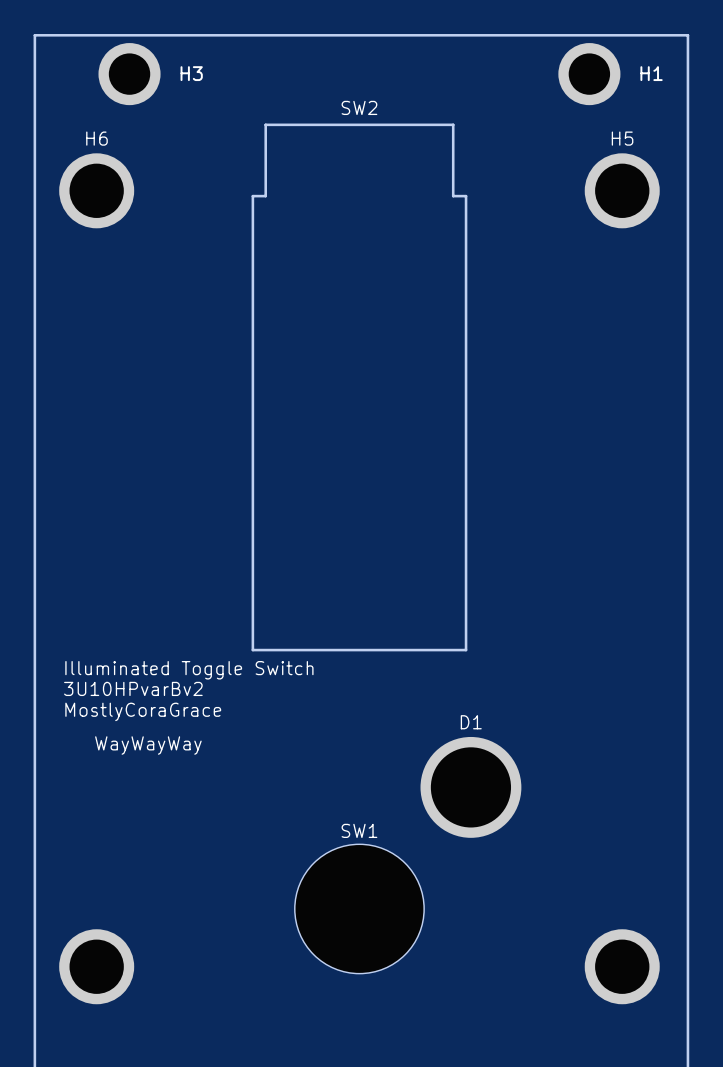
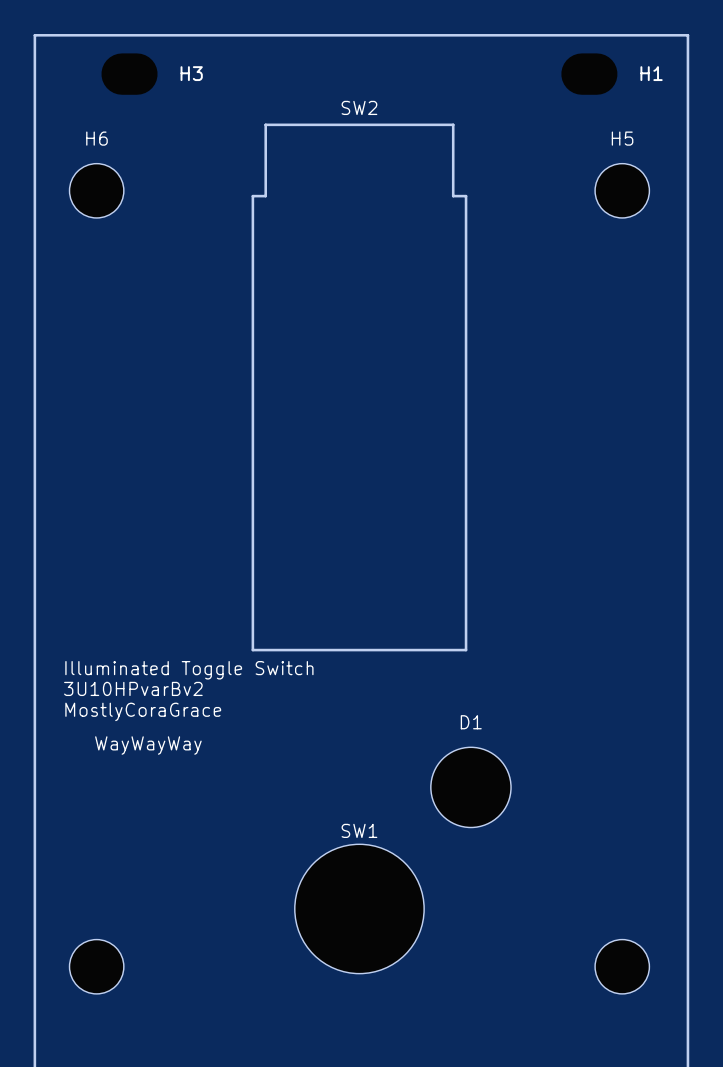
H3 footprint: [98, 43, 161, 106] -> [101, 53, 158, 95]
H1 footprint: [558, 43, 621, 106] -> [561, 53, 618, 95]
H6 footprint: [59, 153, 135, 1005] -> [69, 163, 124, 994]
H5 footprint: [584, 153, 660, 1005] -> [595, 163, 650, 994]
D1 footprint: [420, 736, 522, 838] -> [430, 747, 512, 828]

